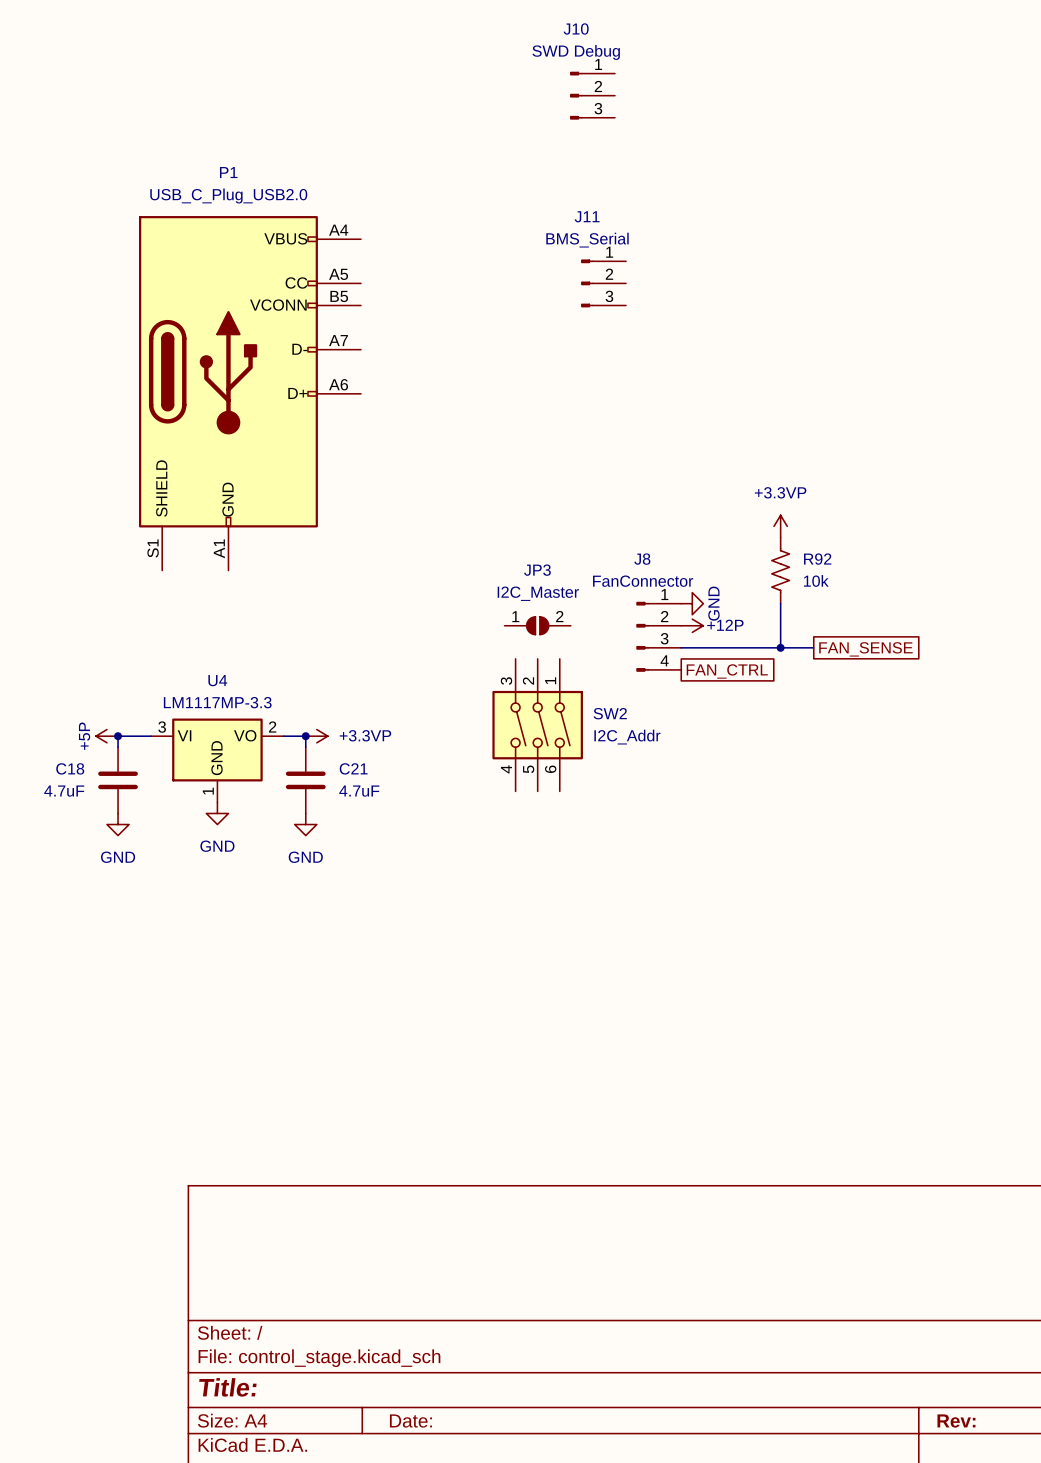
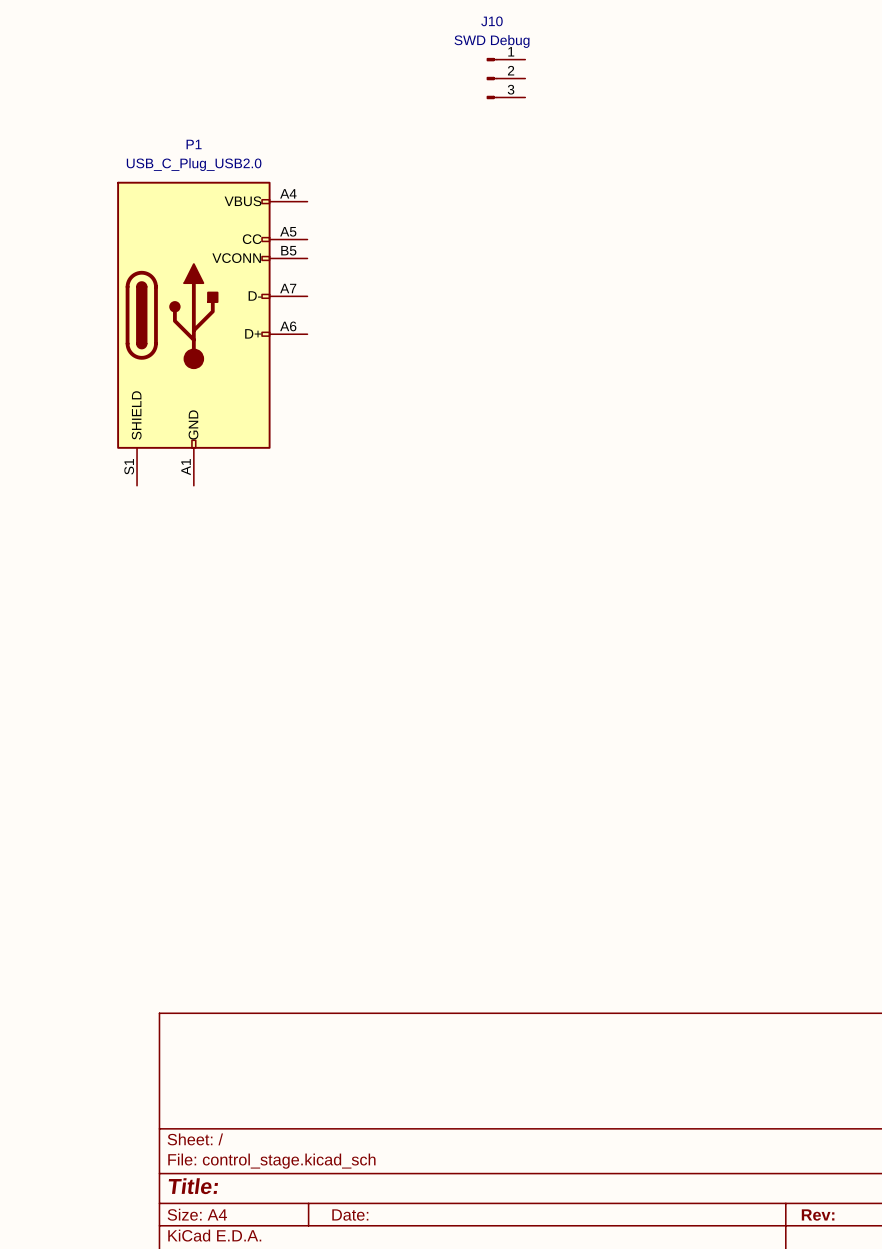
J11: BMS_Serial (603, 283) -> none
power symbol: +3.3VP (780, 526) -> none
R92: 10k (780, 570) -> none
power symbol: GND (692, 603) -> none
wire: (780, 603) (780, 647) -> none
JP3: I2C_Master (537, 625) -> none
power symbol: +12P (692, 625) -> none
J8: FanConnector (658, 636) -> none
wire: (681, 647) (813, 647) -> none
junction: (780, 647) -> none
global label: FAN_SENSE (865, 649) -> none
global label: FAN_CTRL (727, 671) -> none
SW2: I2C_Addr (537, 725) -> none
power symbol: +5P (106, 736) -> none
junction: (118, 736) -> none
wire: (151, 736) (118, 736) (118, 747) -> none
wire: (283, 736) (305, 736) (305, 747) -> none
junction: (305, 736) -> none
power symbol: +3.3VP (316, 736) -> none
U4: LM1117MP-3.3 (217, 760) -> none
C18: 4.7uF (118, 780) -> none
C21: 4.7uF (305, 780) -> none
power symbol: GND (217, 813) -> none
power symbol: GND (118, 824) -> none
power symbol: GND (305, 824) -> none

